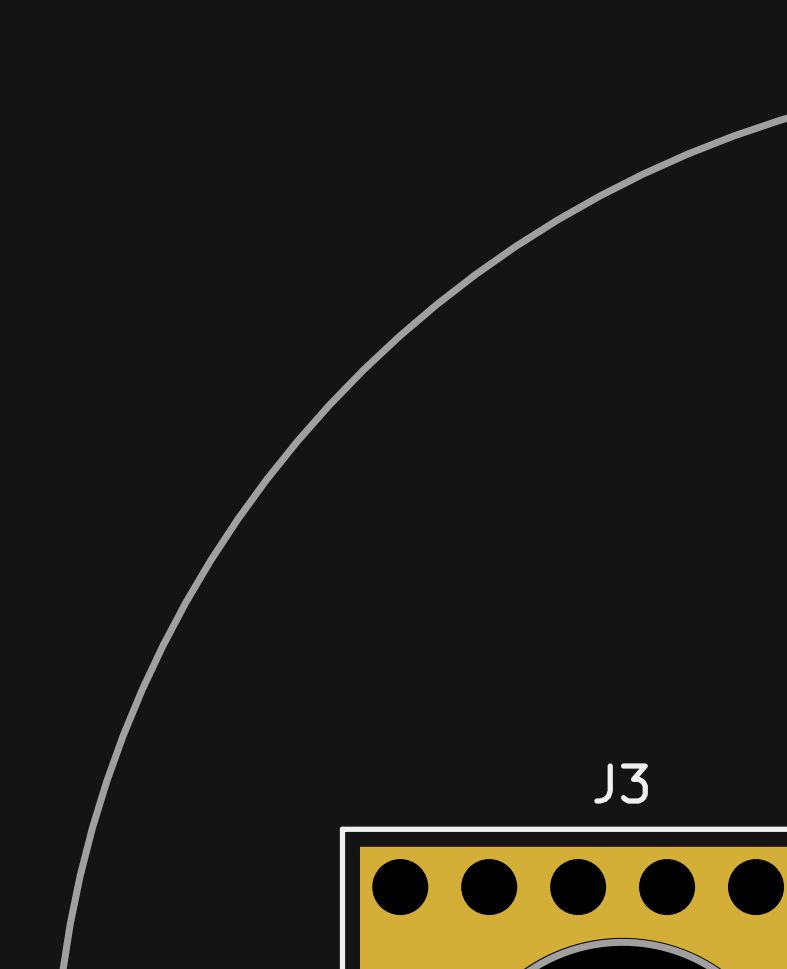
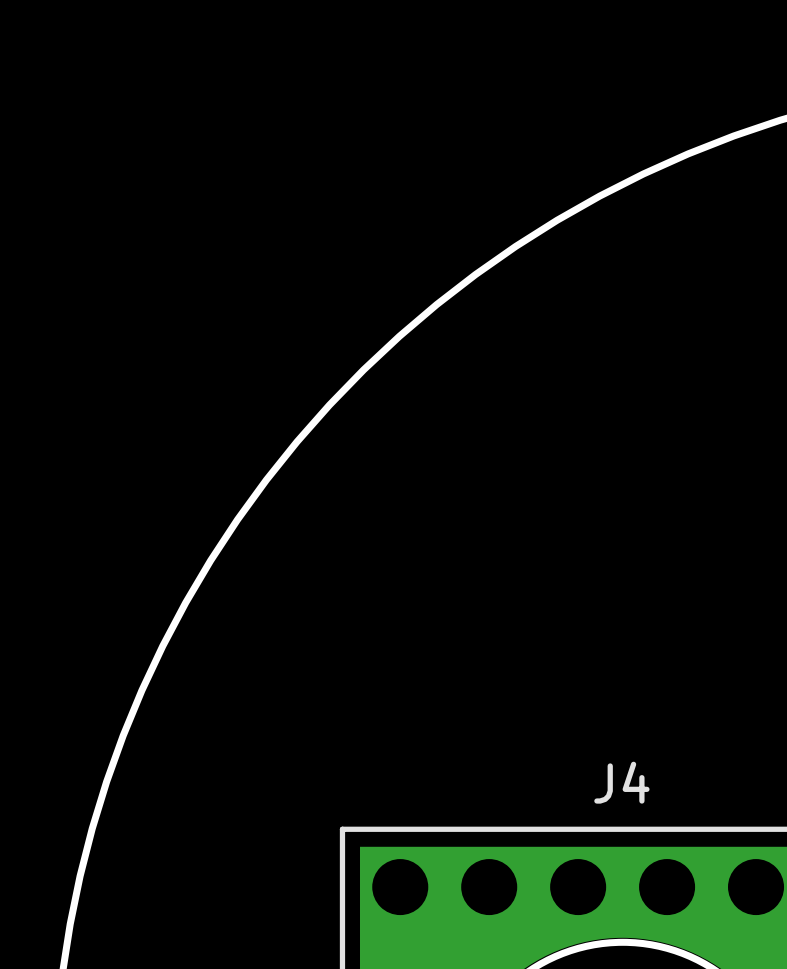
J3 name: J3 (621, 783) -> J4 (621, 782)

